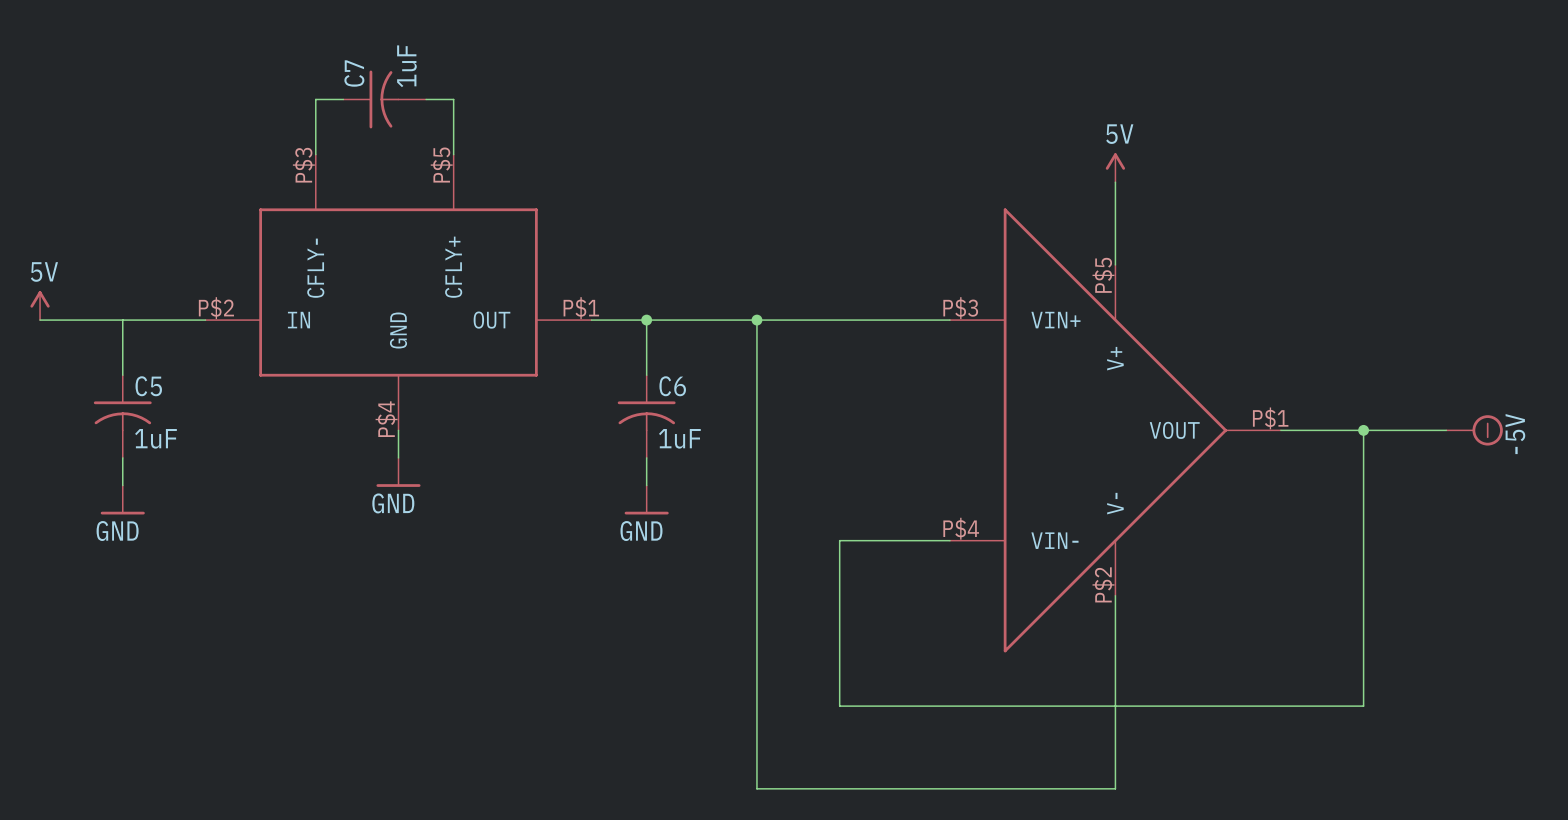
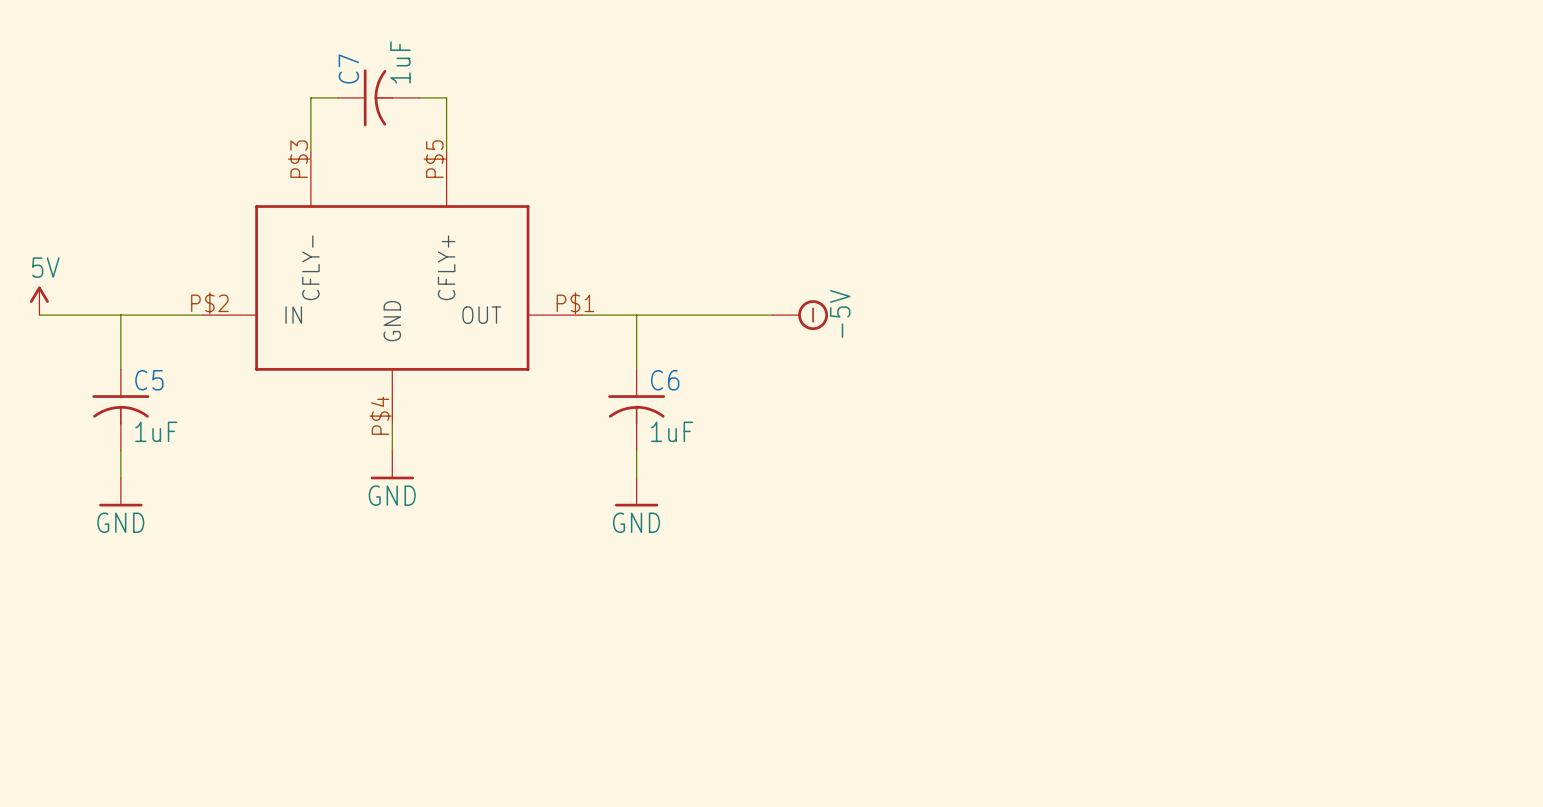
power symbol: 5V (1115, 167) -> none
wire: (1115, 182) (1115, 264) -> none
junction: (646, 320) -> none
wire: (756, 320) (756, 788) (1115, 788) (1115, 595) -> none
junction: (756, 320) -> none
wire: (784, 320) (949, 320) -> none
power symbol: none -> -5V (800, 315)
part: (1115, 430) -> none
wire: (1280, 430) (1446, 430) -> none
wire: (1363, 430) (1363, 706) (839, 706) (839, 540) (949, 540) -> none
junction: (1363, 430) -> none
power symbol: -5V (1474, 430) -> none

